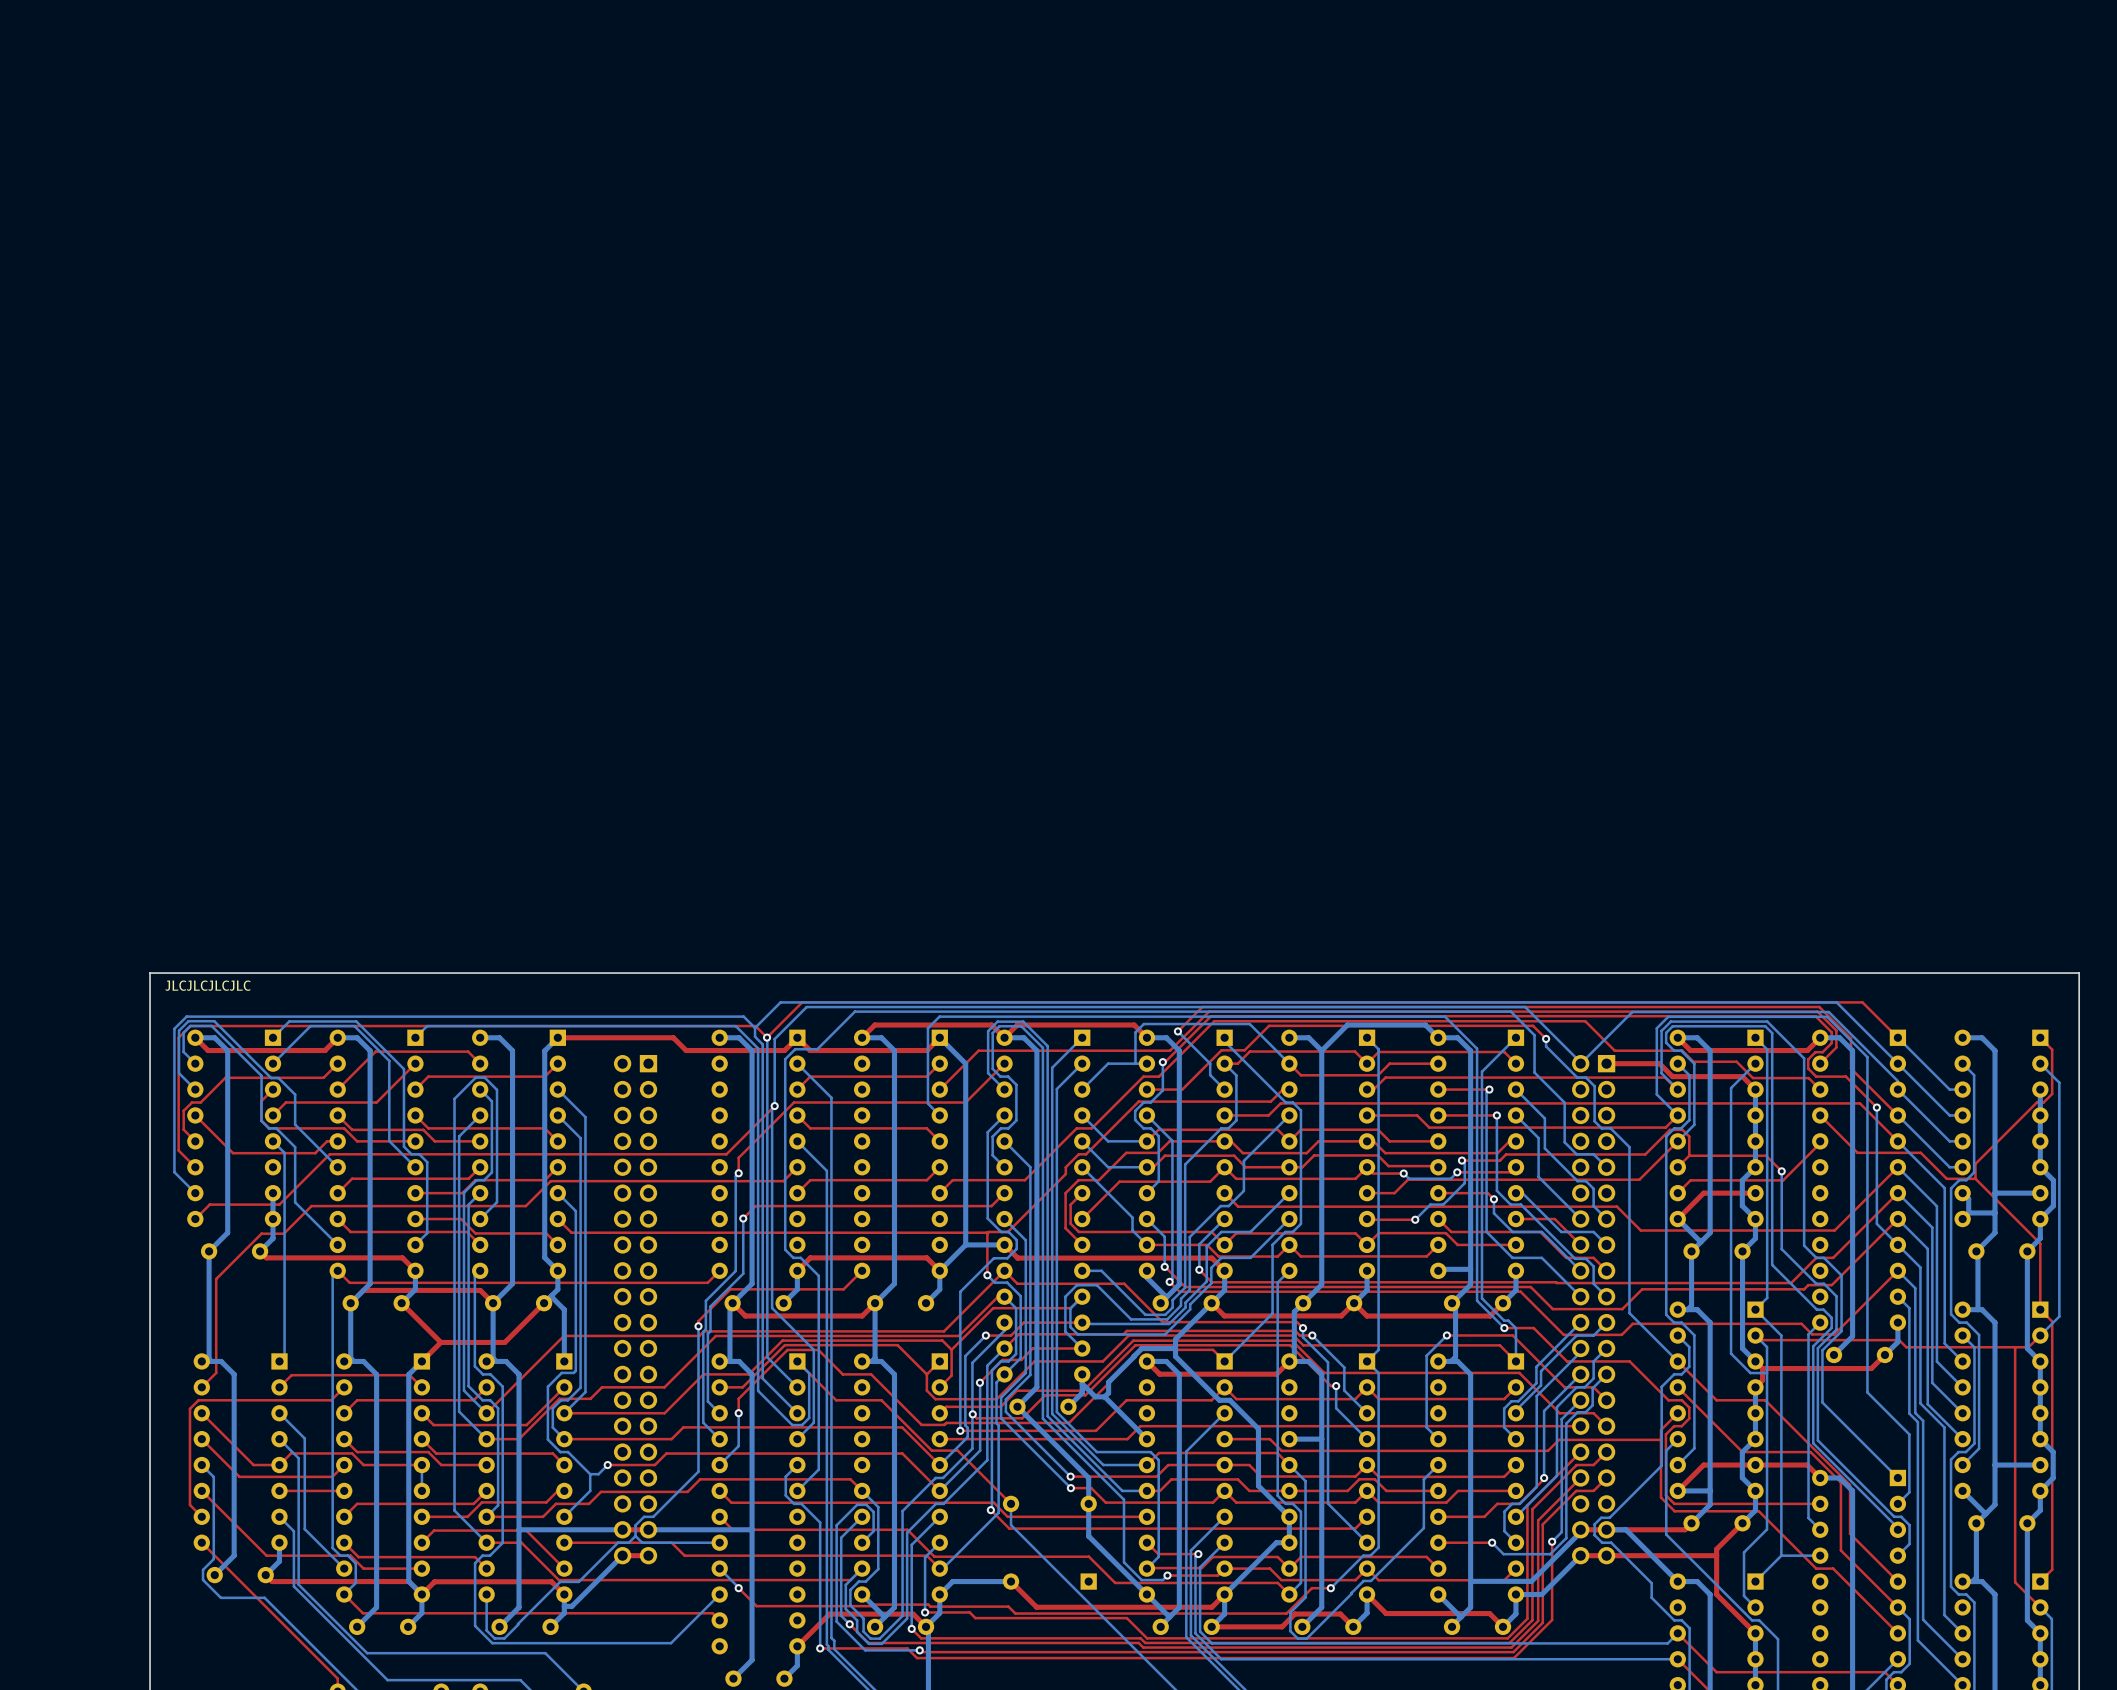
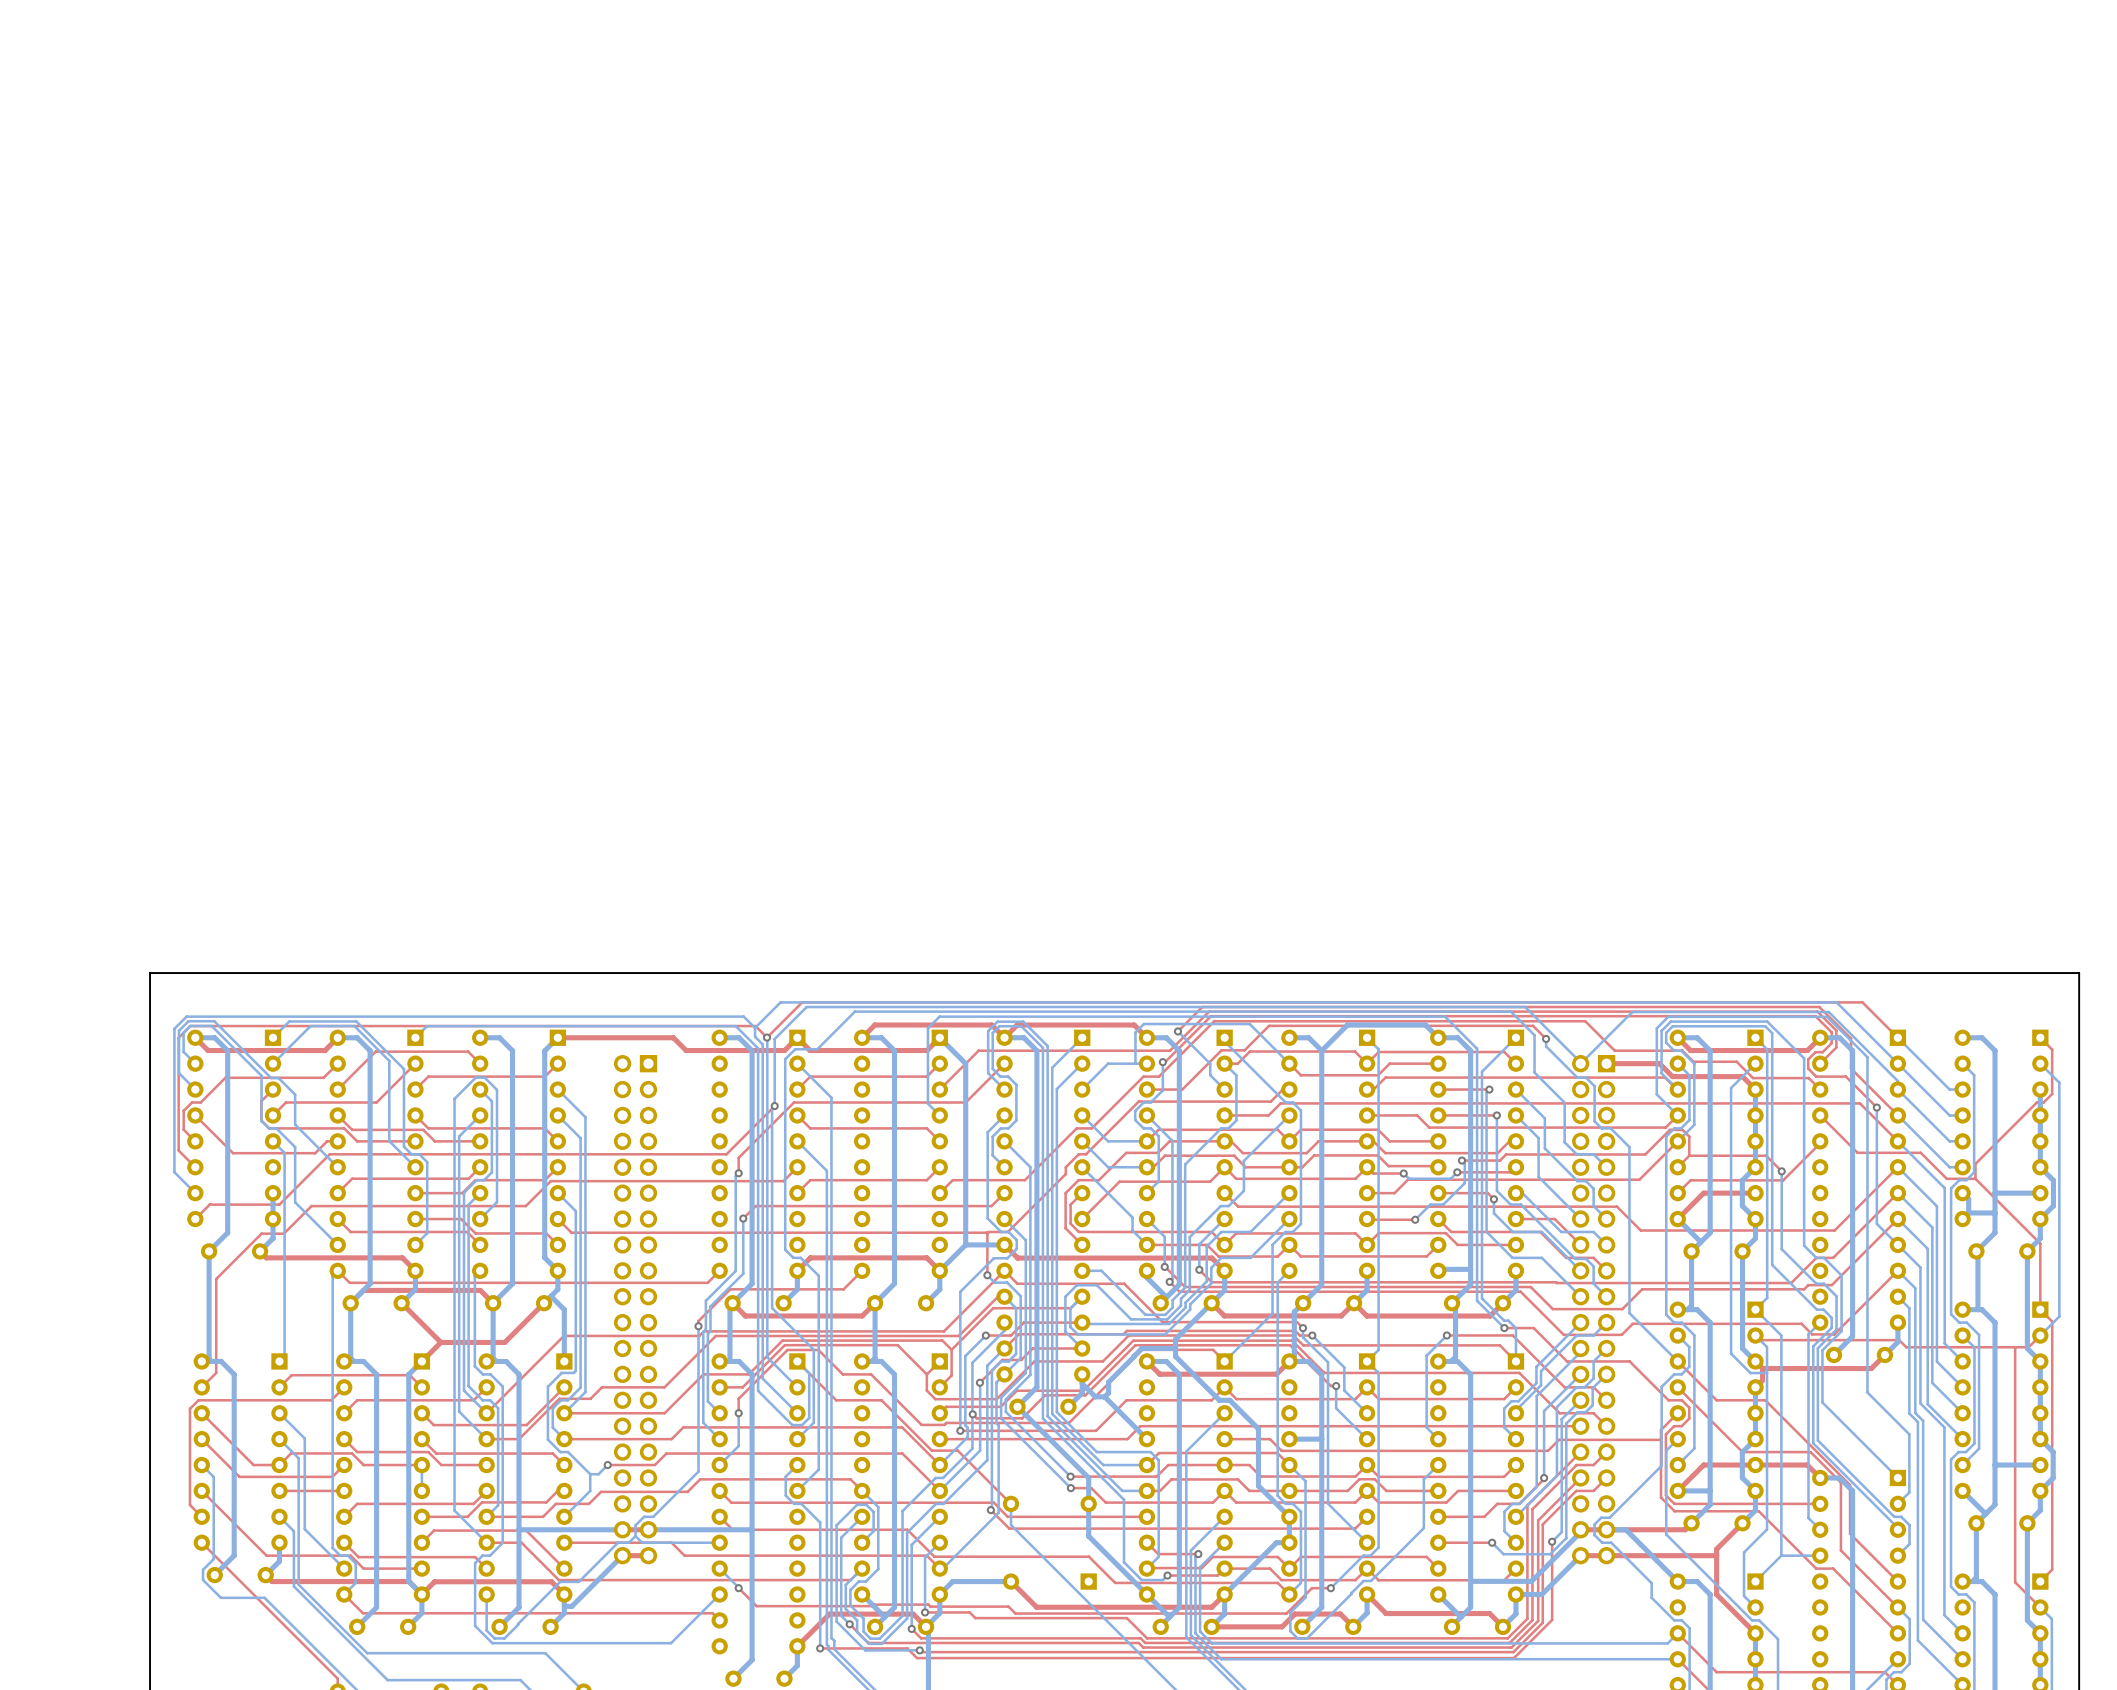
text: JLCJLCJLCJLC (208, 985) -> none

